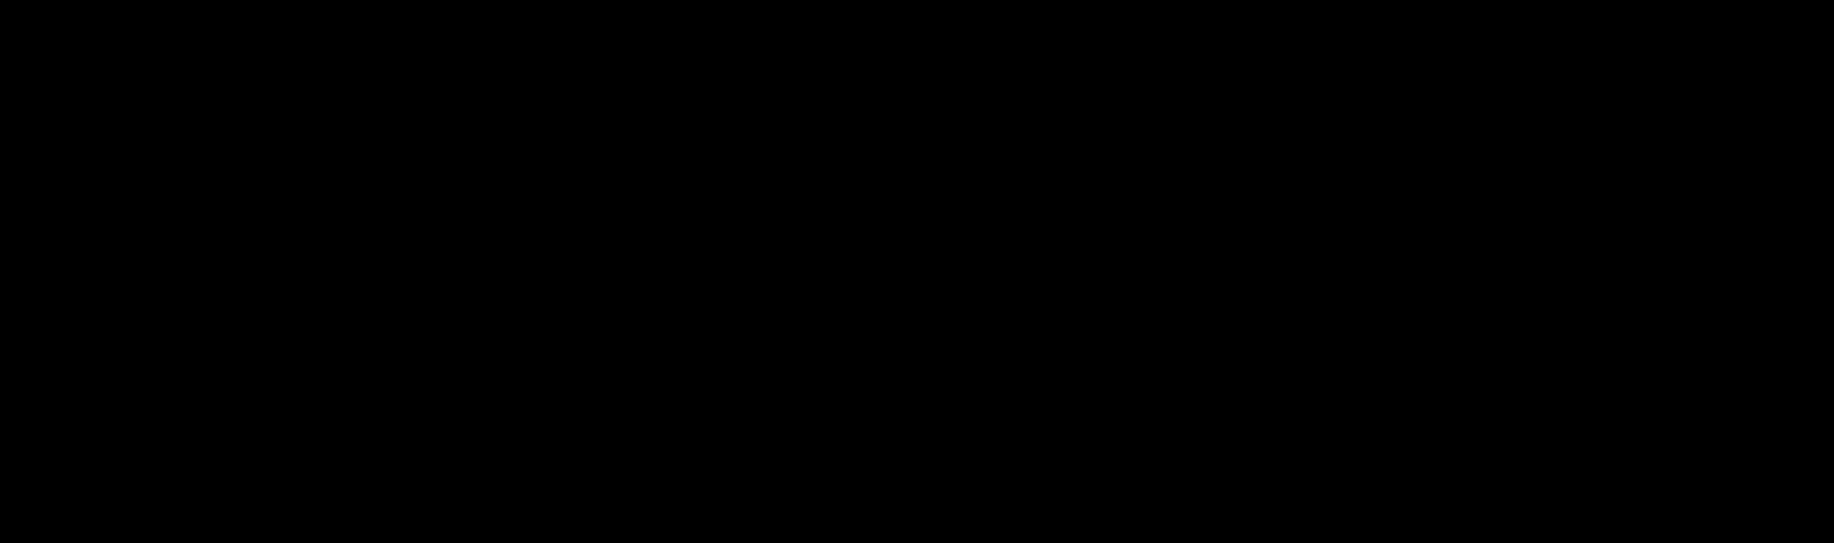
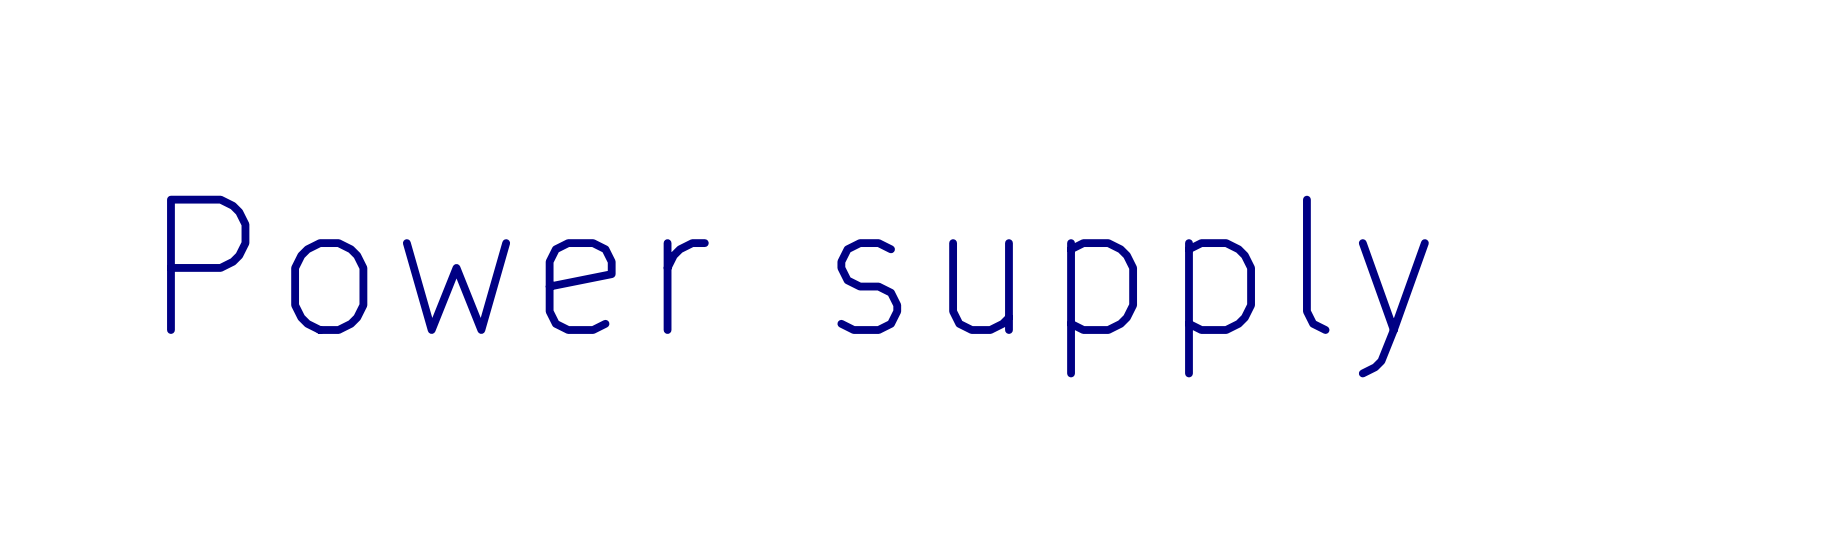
text: none -> Power supply (797, 286)

